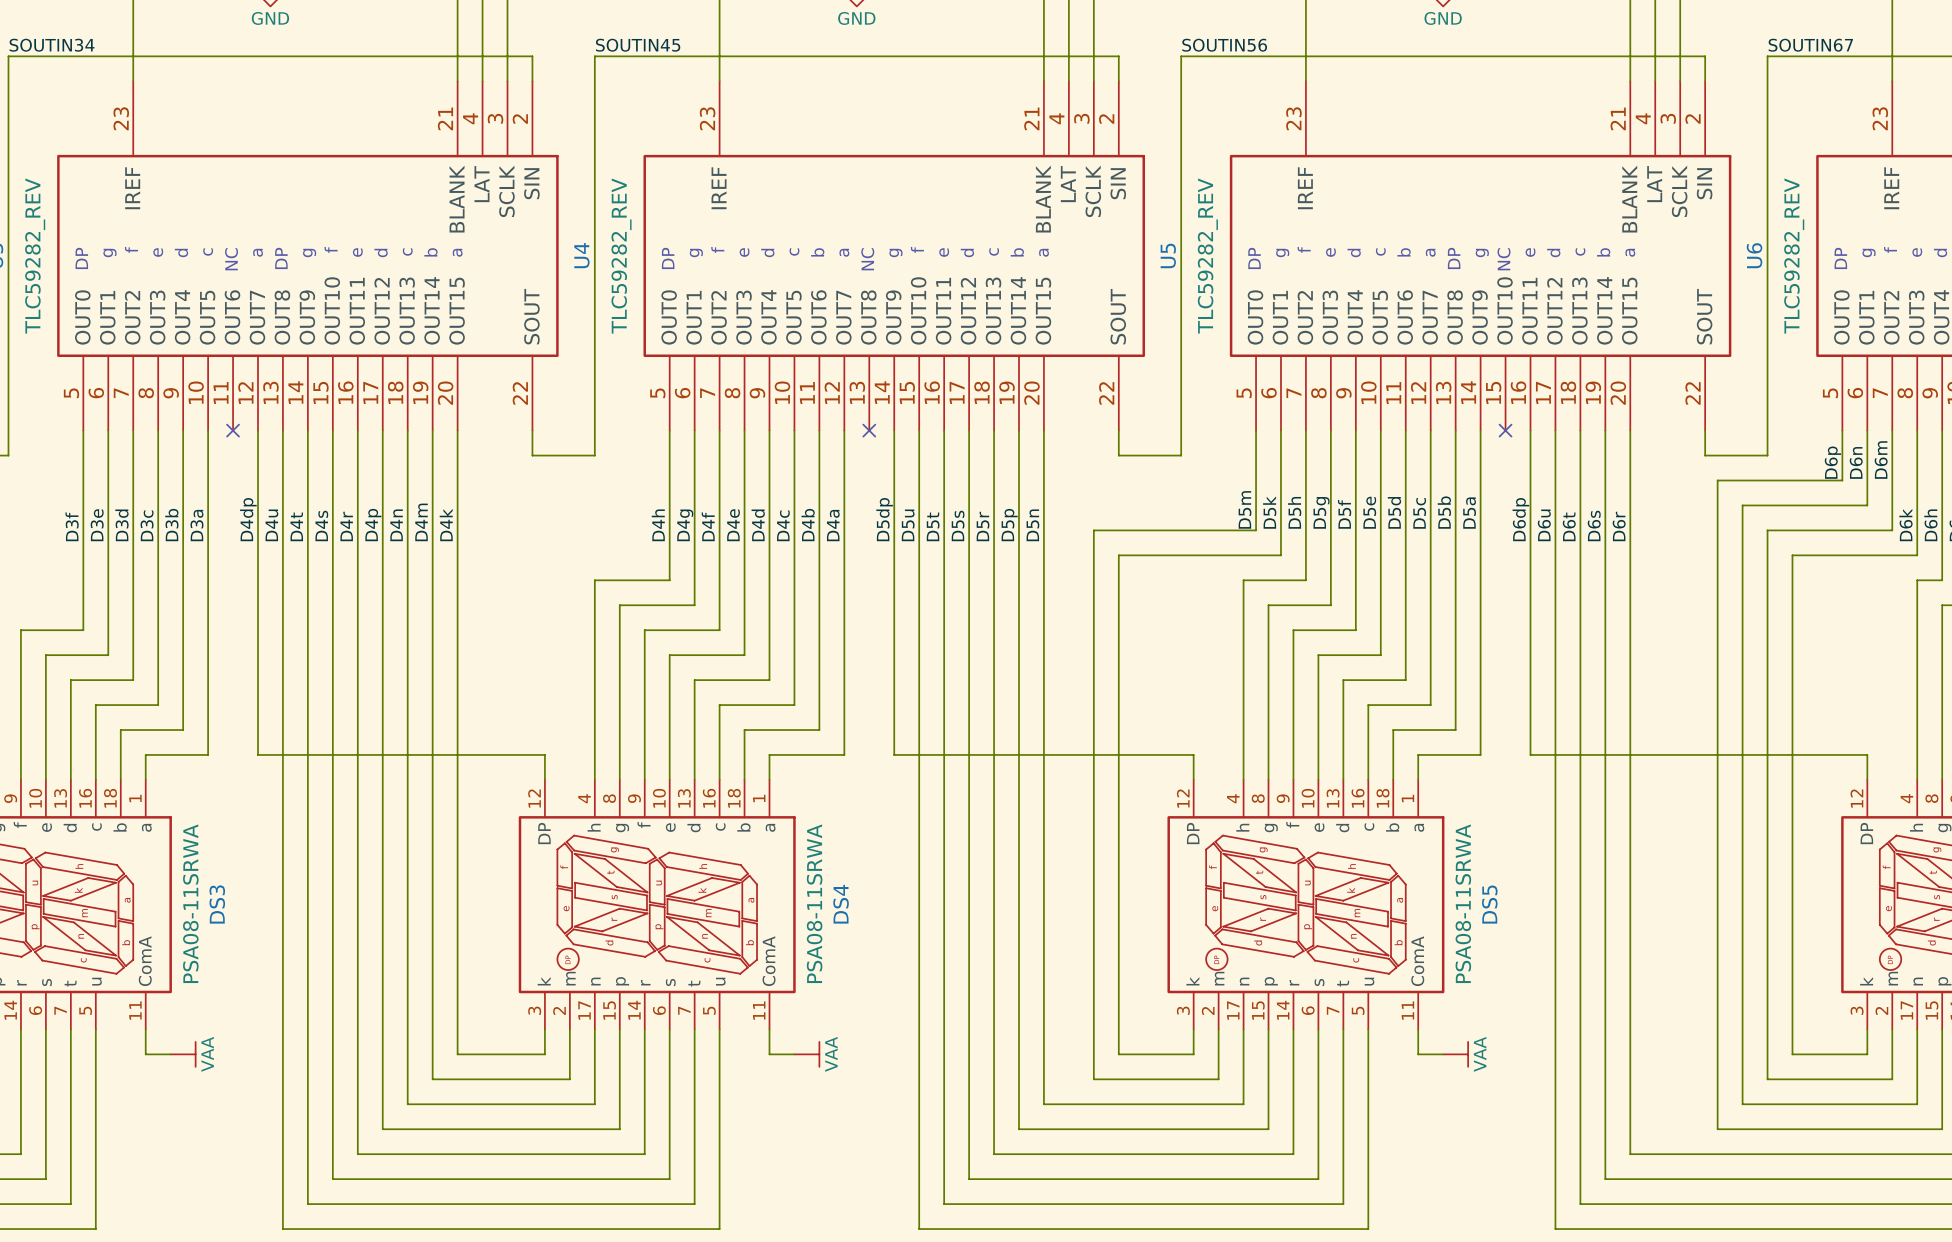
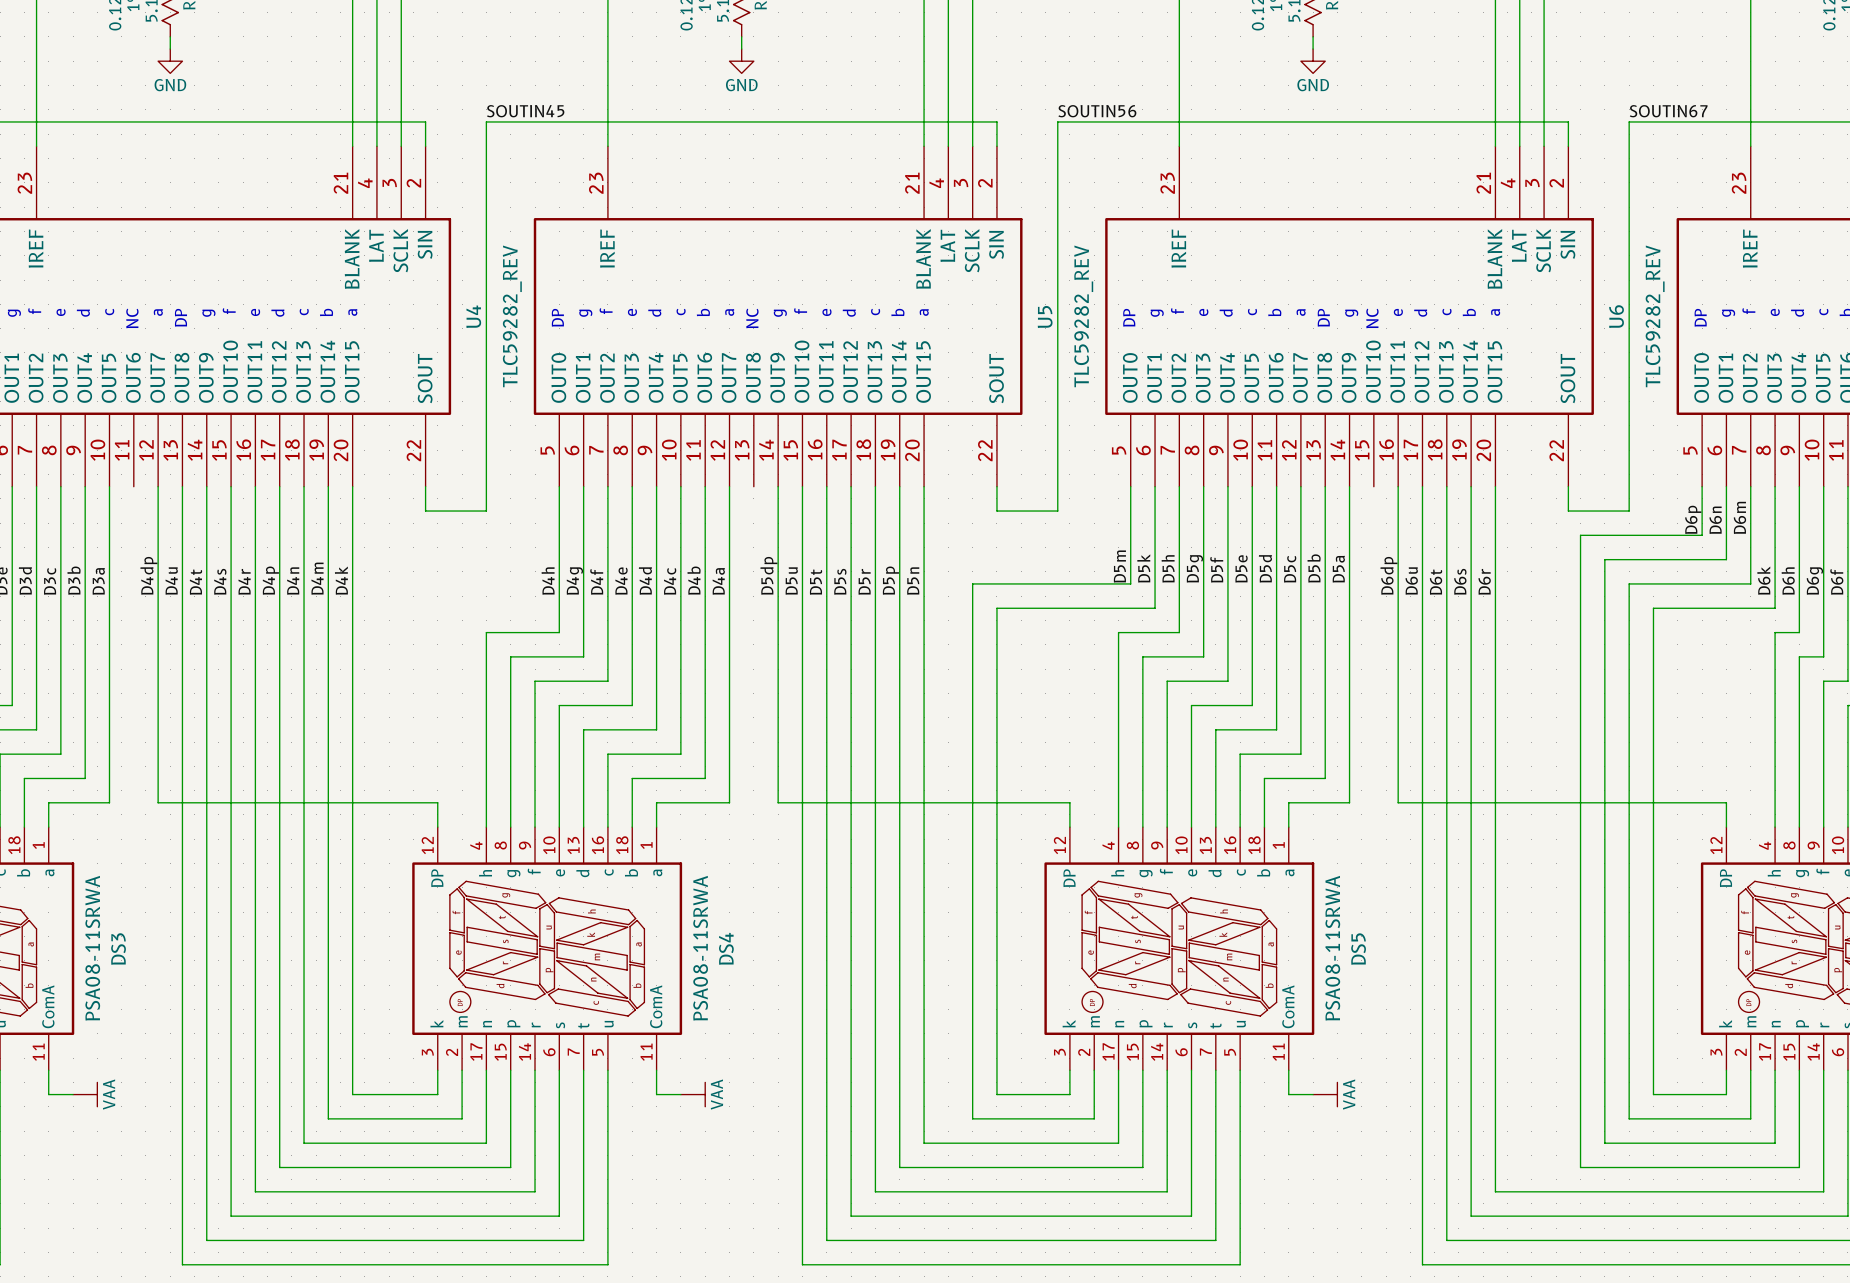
no-connect mark: (233, 430) -> none
no-connect mark: (869, 430) -> none
no-connect mark: (1505, 430) -> none

